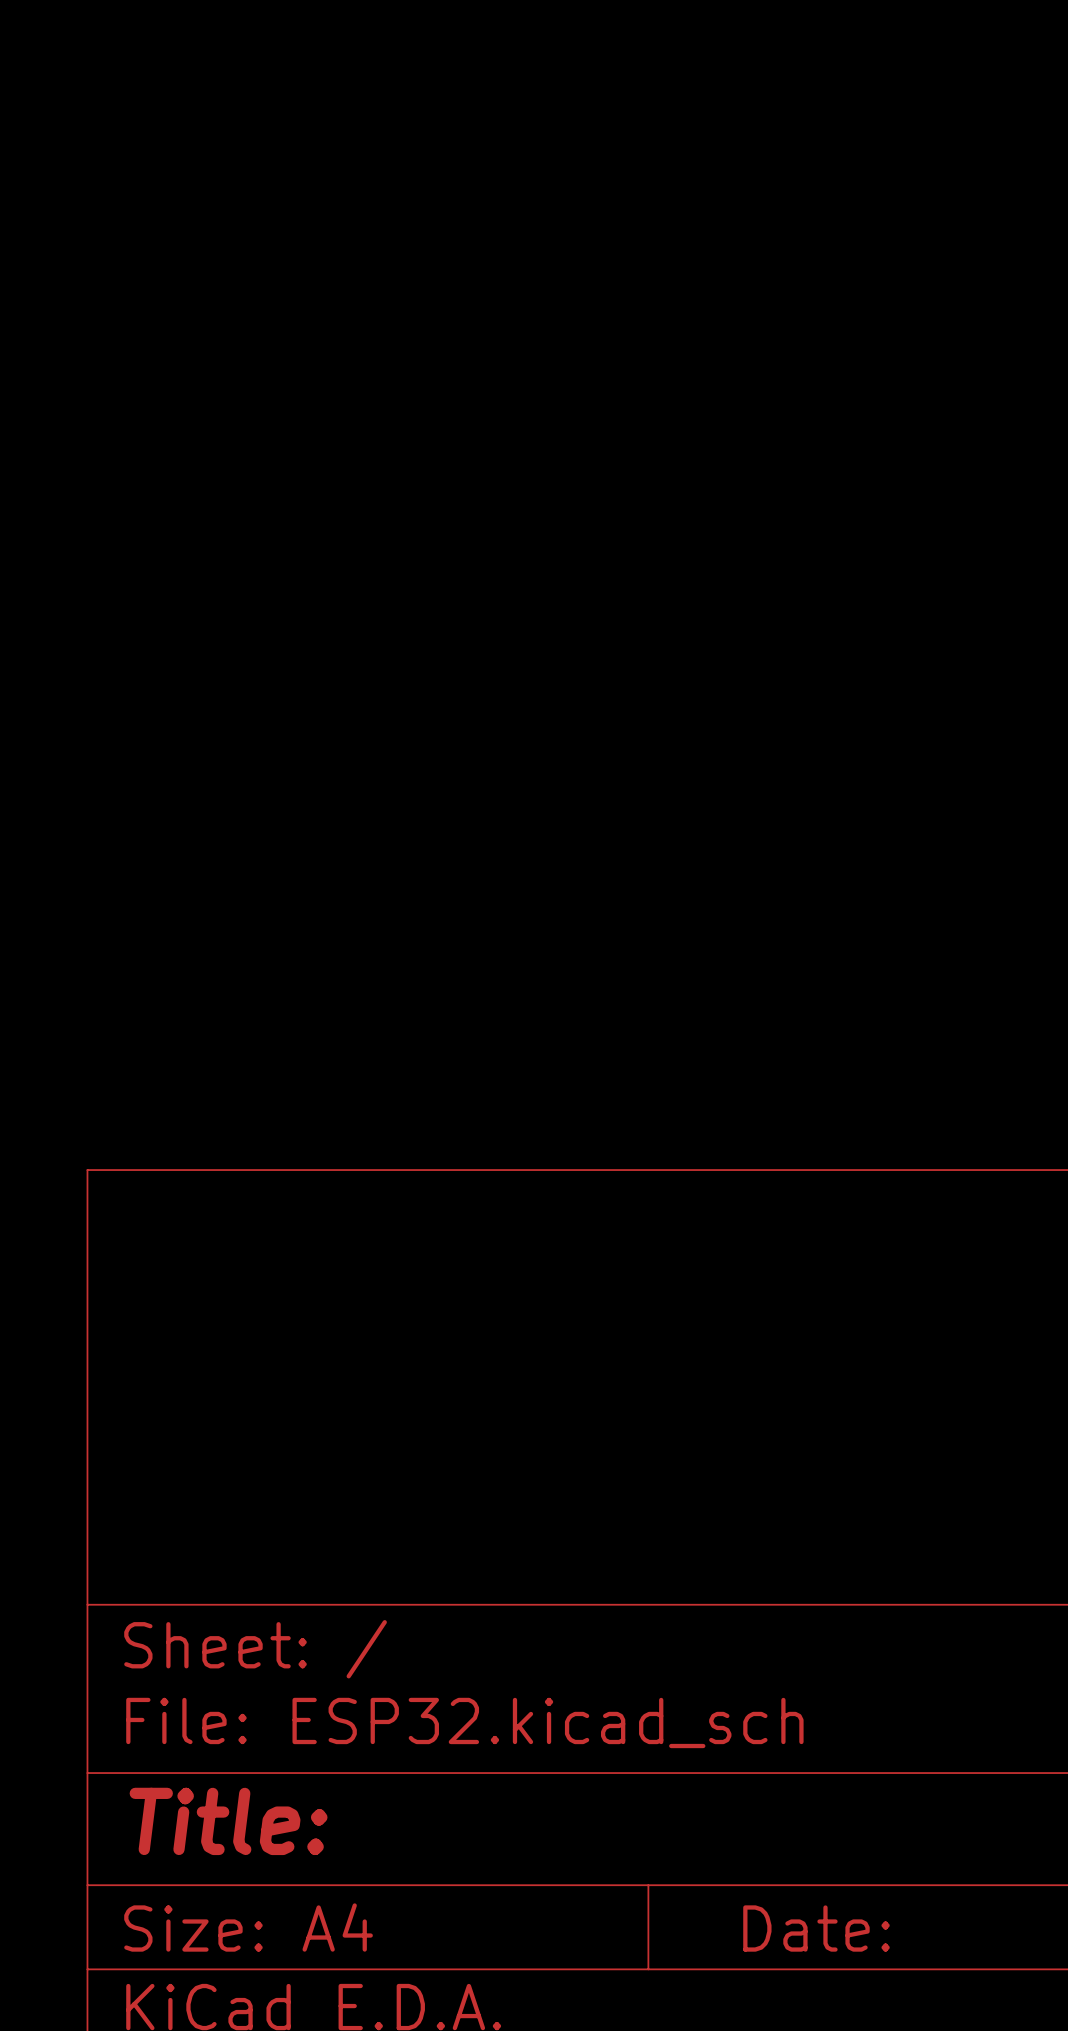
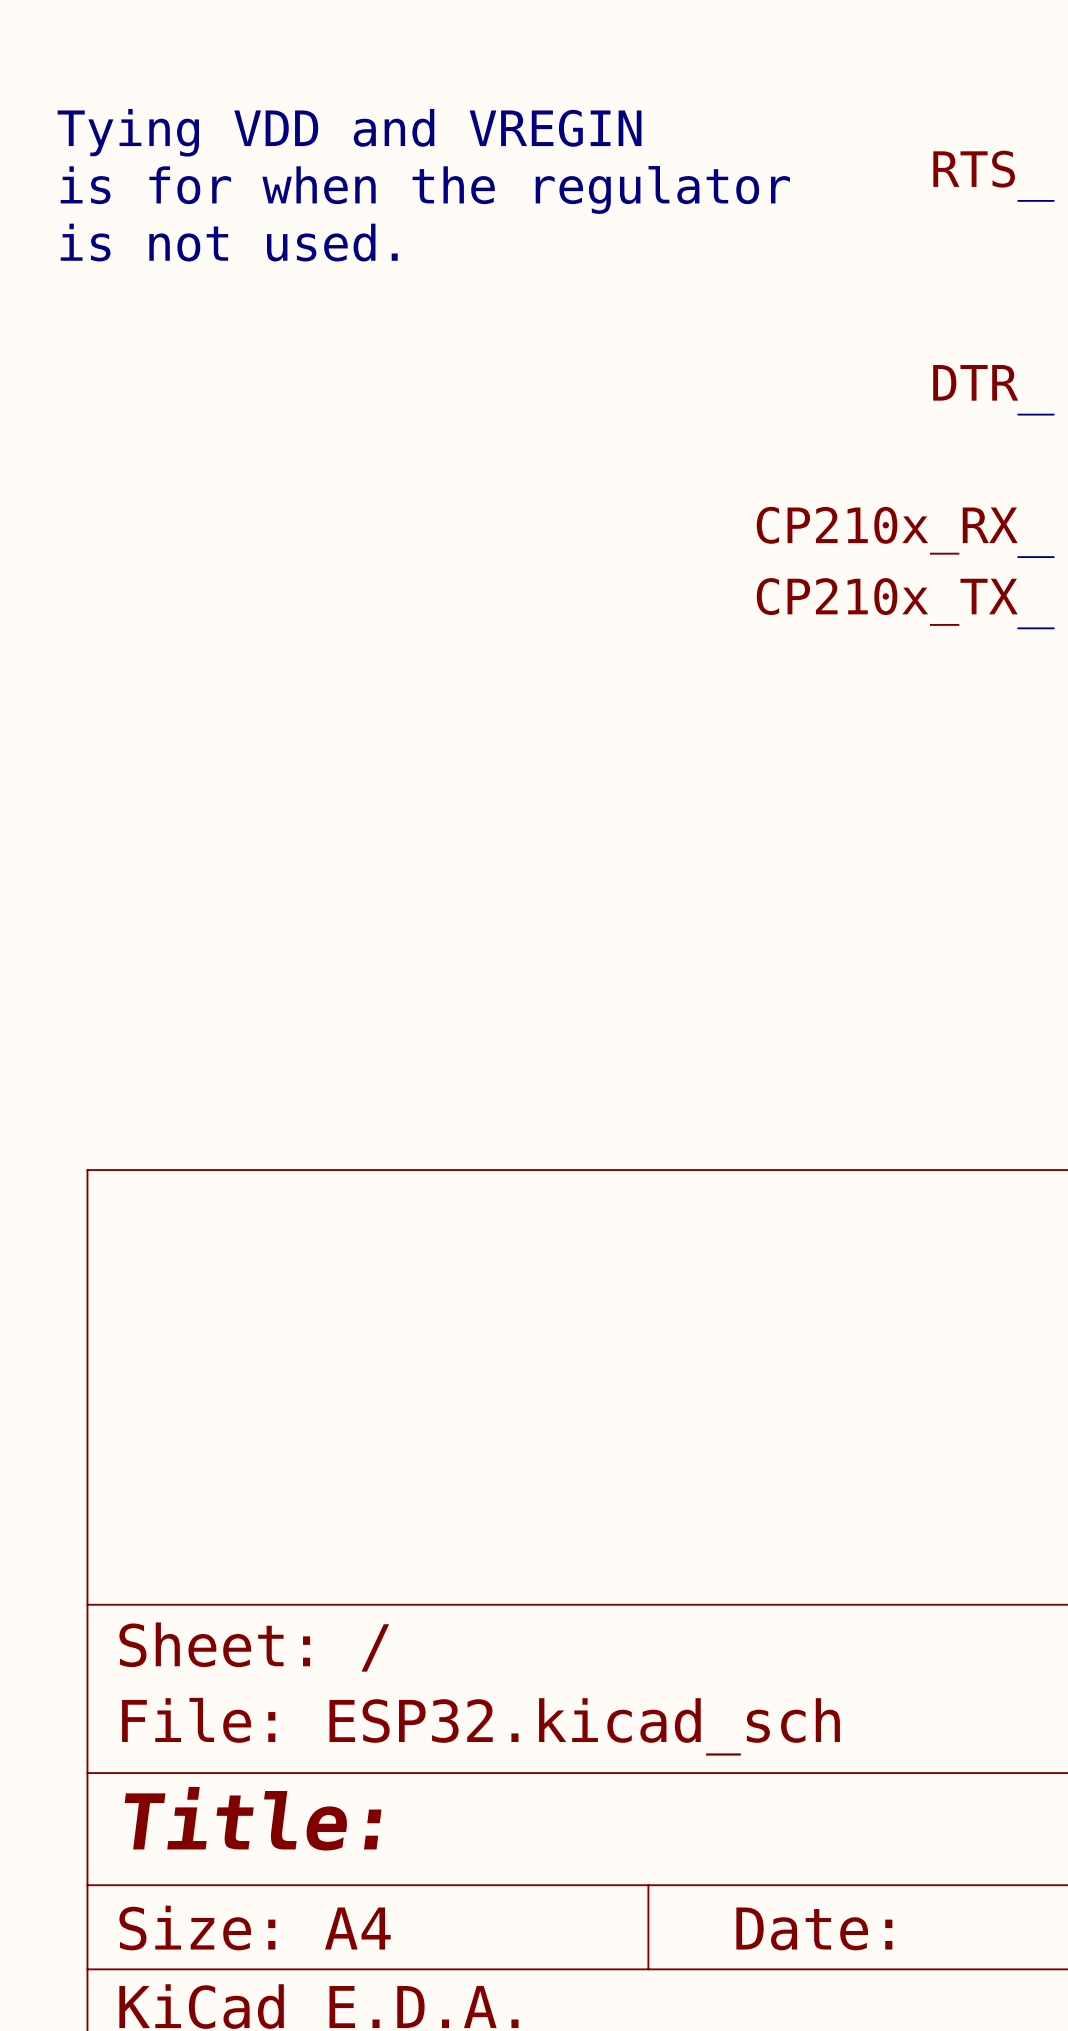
text: none -> Tying VDD and VREGIN (349, 132)
label: none -> RTS (974, 169)
text: none -> is for when the regulator (425, 189)
wire: none -> (1018, 200) (1053, 200)
text: none -> is not used. (229, 242)
label: none -> DTR (975, 382)
wire: none -> (1018, 414) (1053, 414)
label: none -> CP210x_RX (887, 530)
wire: none -> (1018, 557) (1053, 557)
label: none -> CP210x_TX (887, 601)
wire: none -> (1018, 628) (1053, 628)

